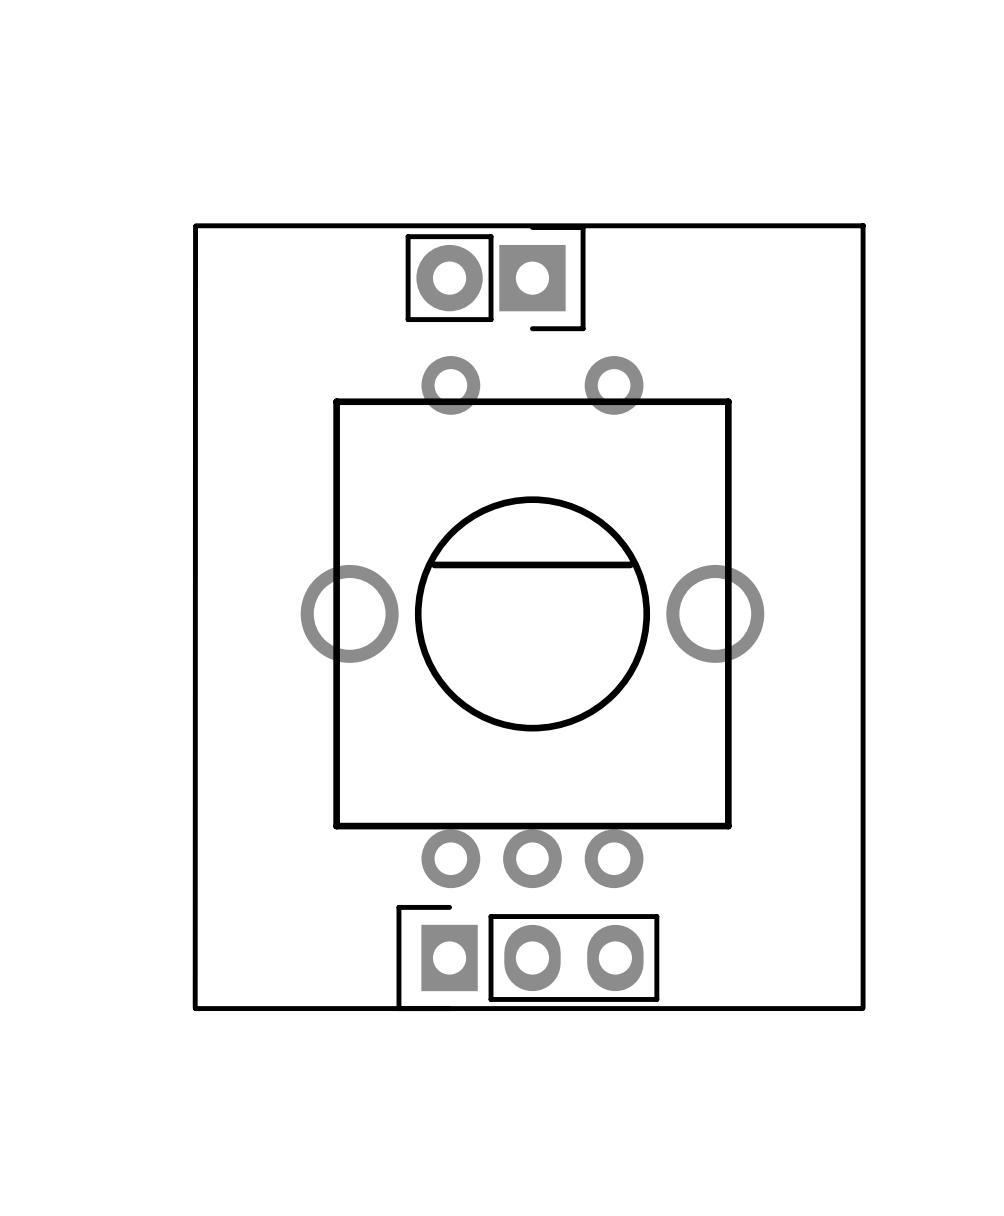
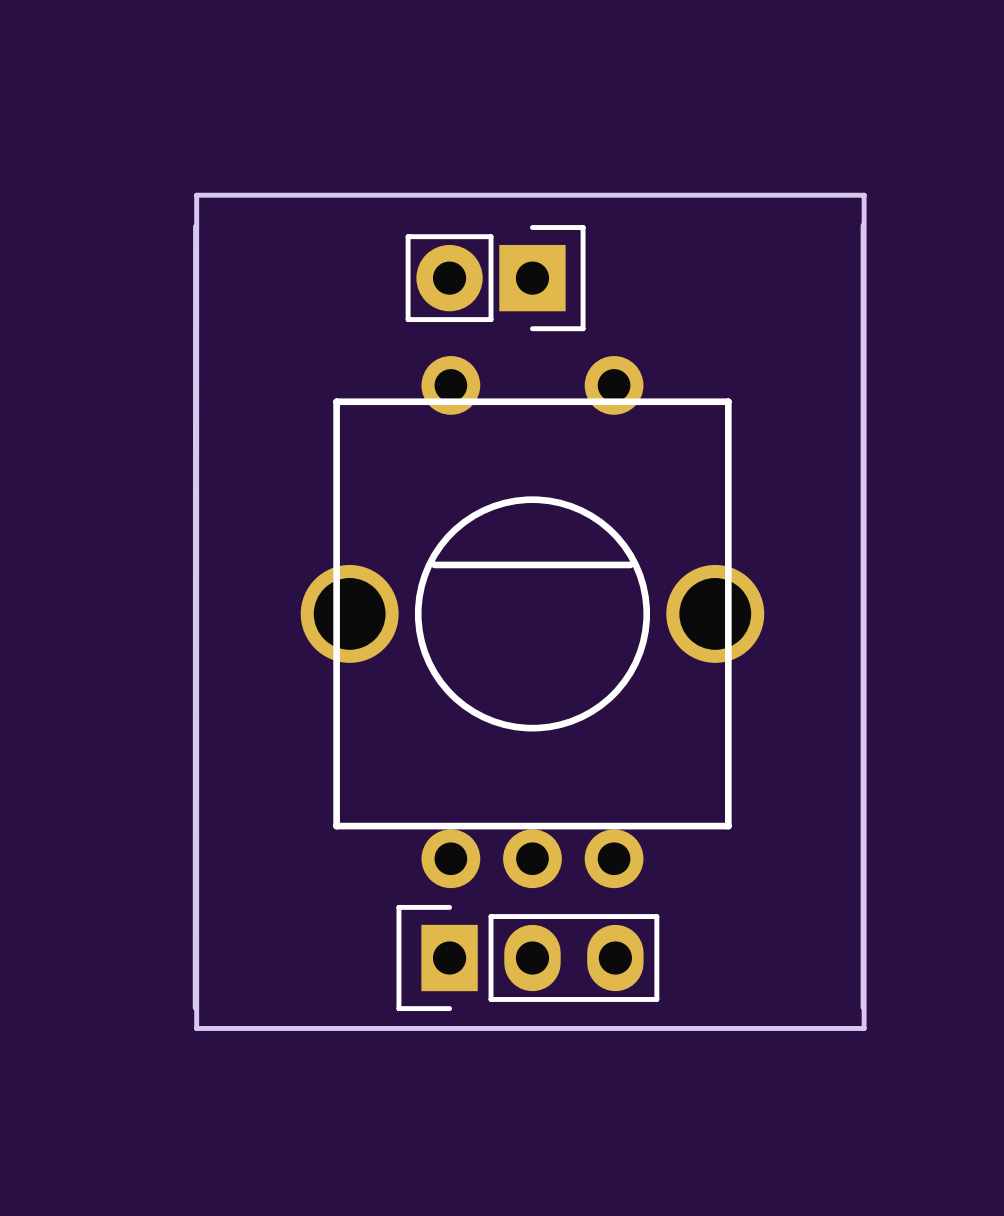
board edge: none -> (196, 195) (864, 195) (864, 1028) (196, 1028) (196, 195)
board edge: (195, 225) (863, 225) -> none
board edge: (195, 1008) (862, 1008) -> none

